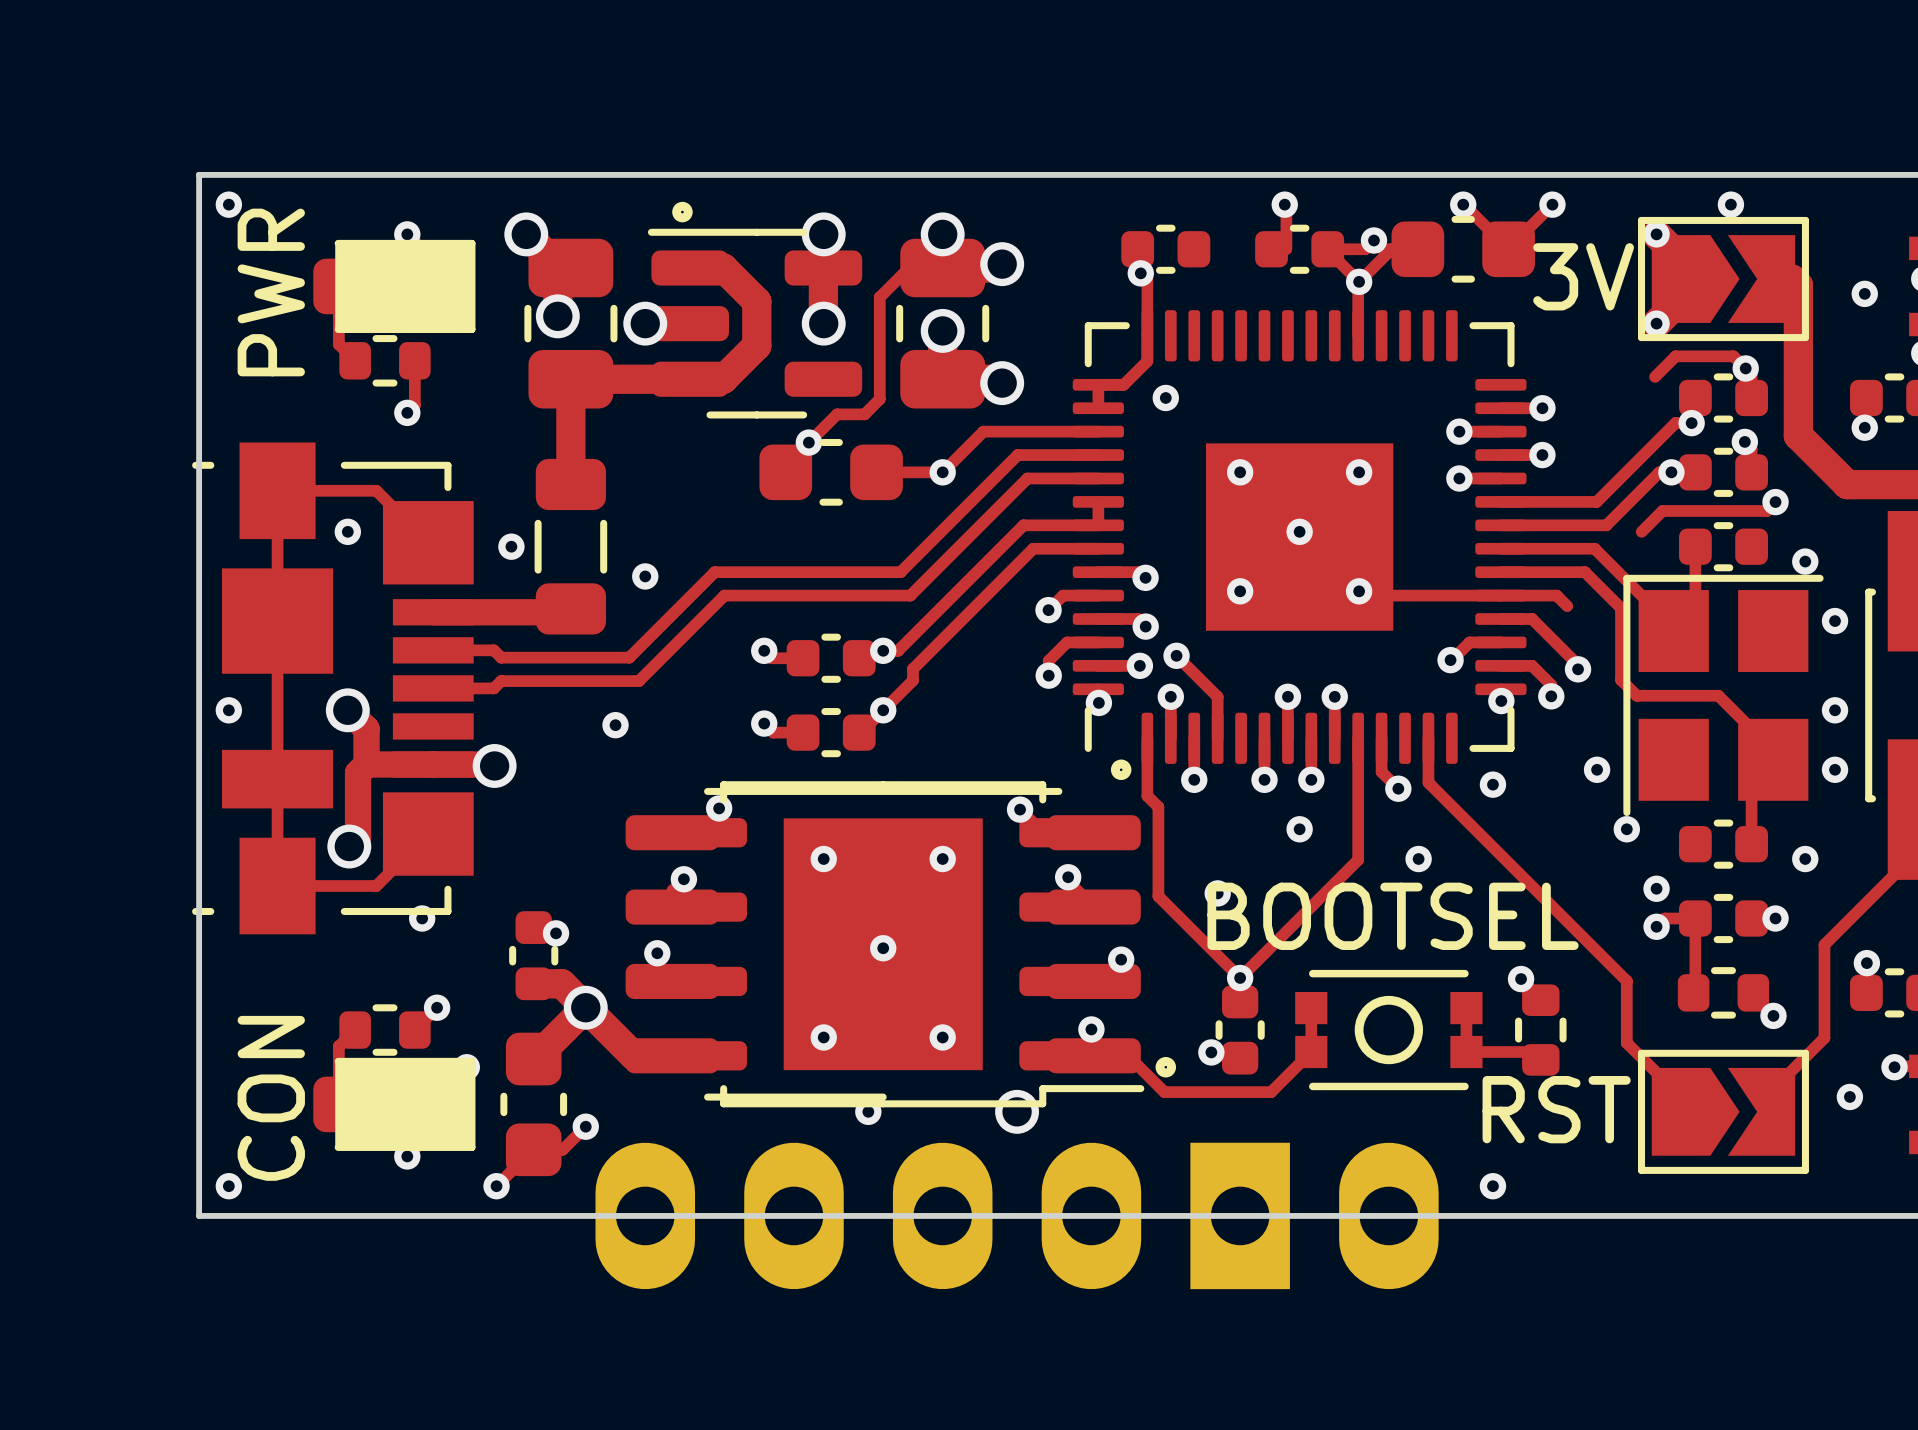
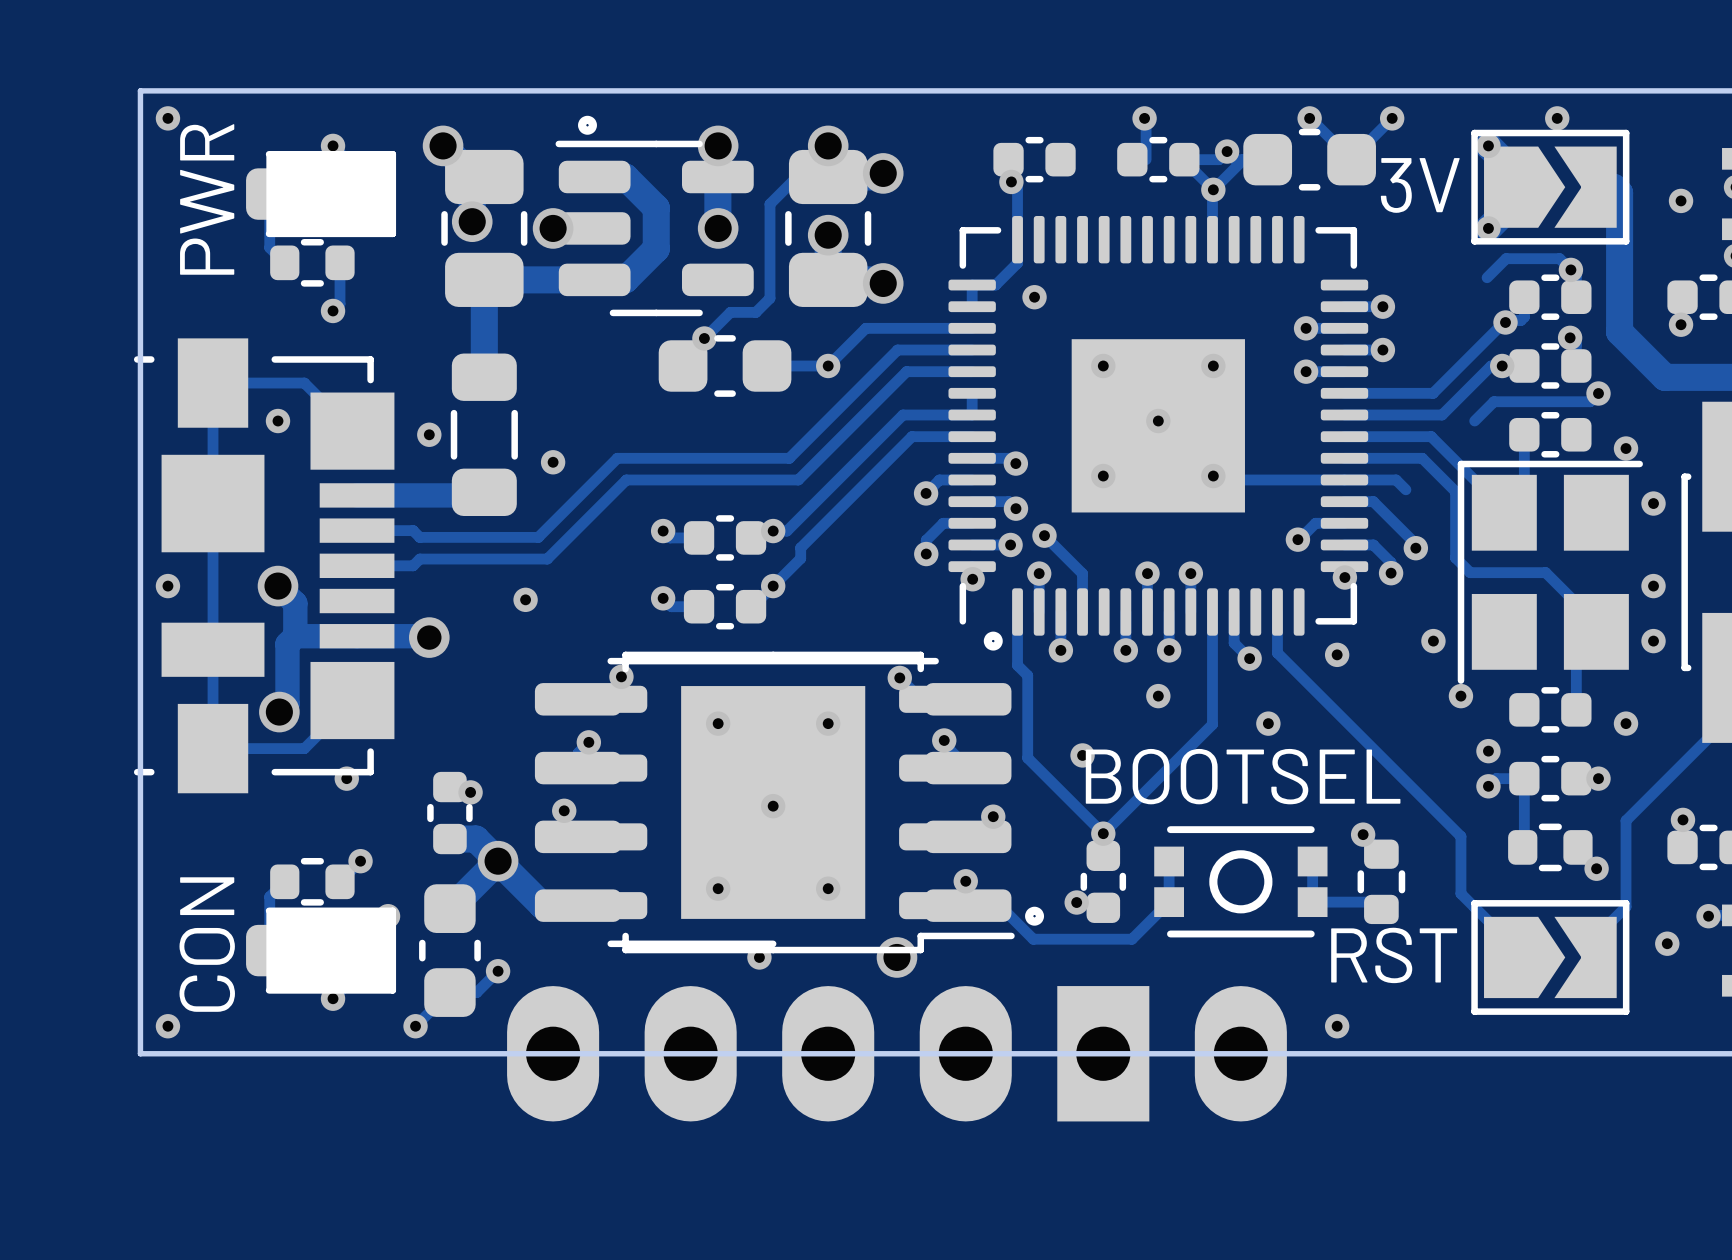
via position: (1691, 423) -> (1505, 322)
via position: (494, 765) -> (429, 637)
track: (1824, 944) (1824, 1038) (1805, 1057) -> (1643, 802) (1626, 820) (1626, 906)

